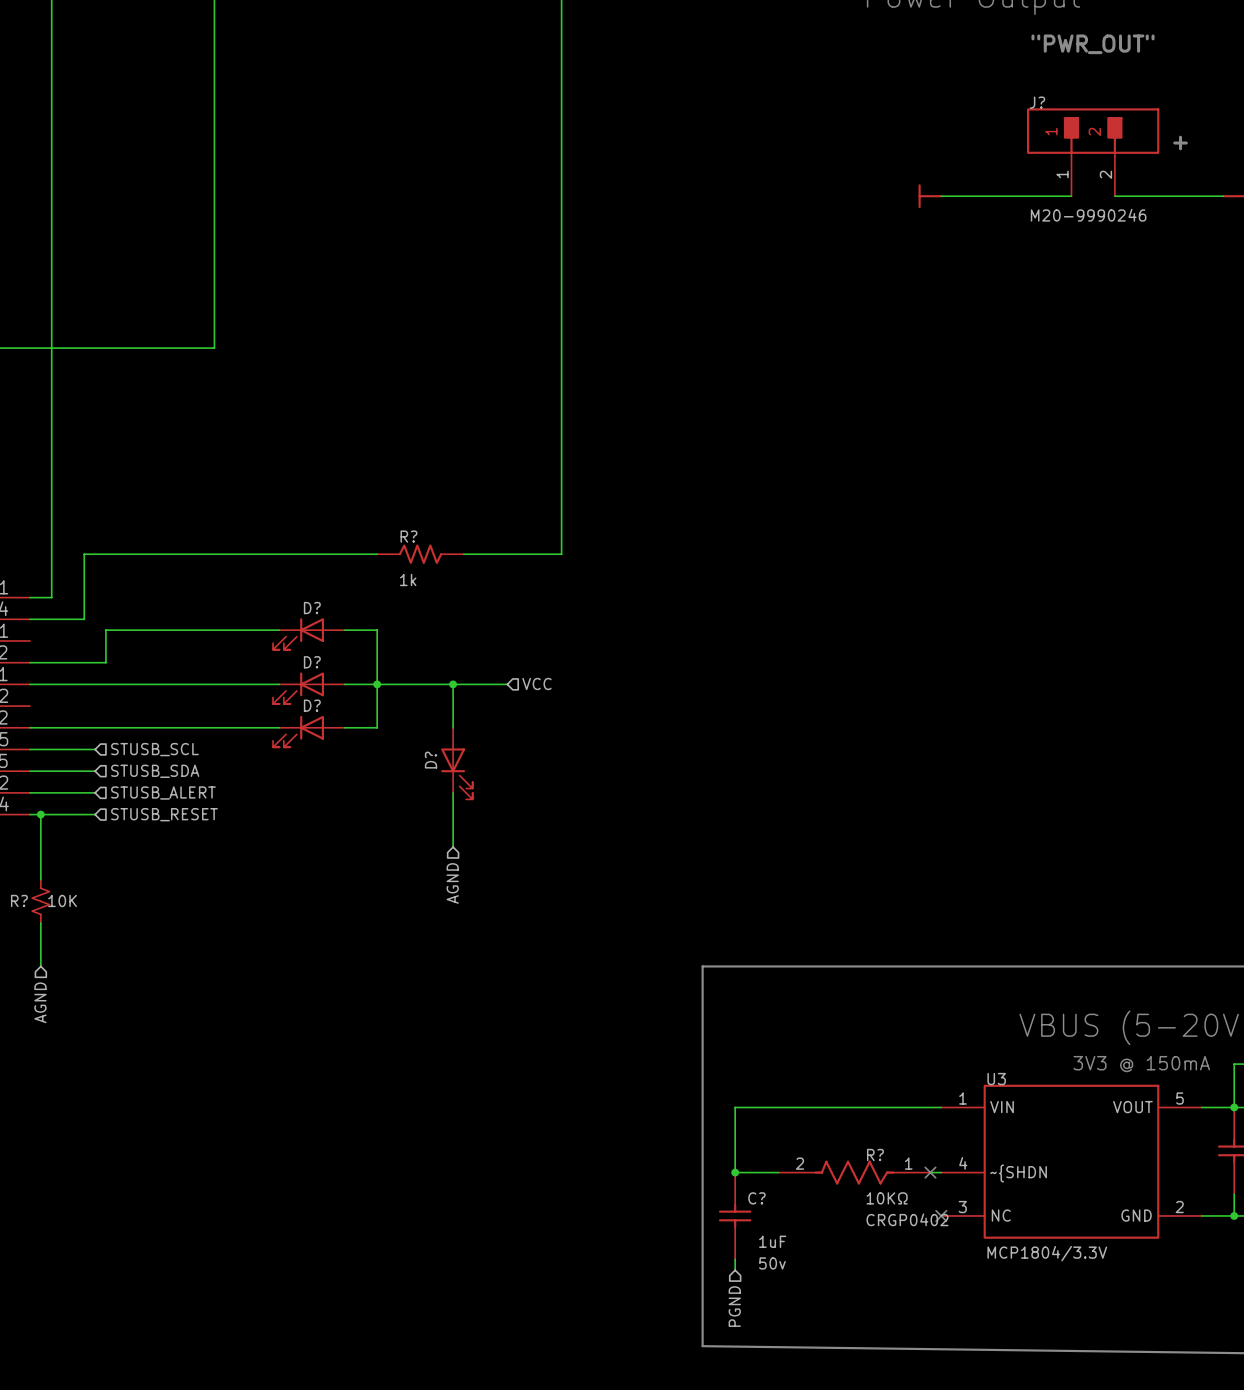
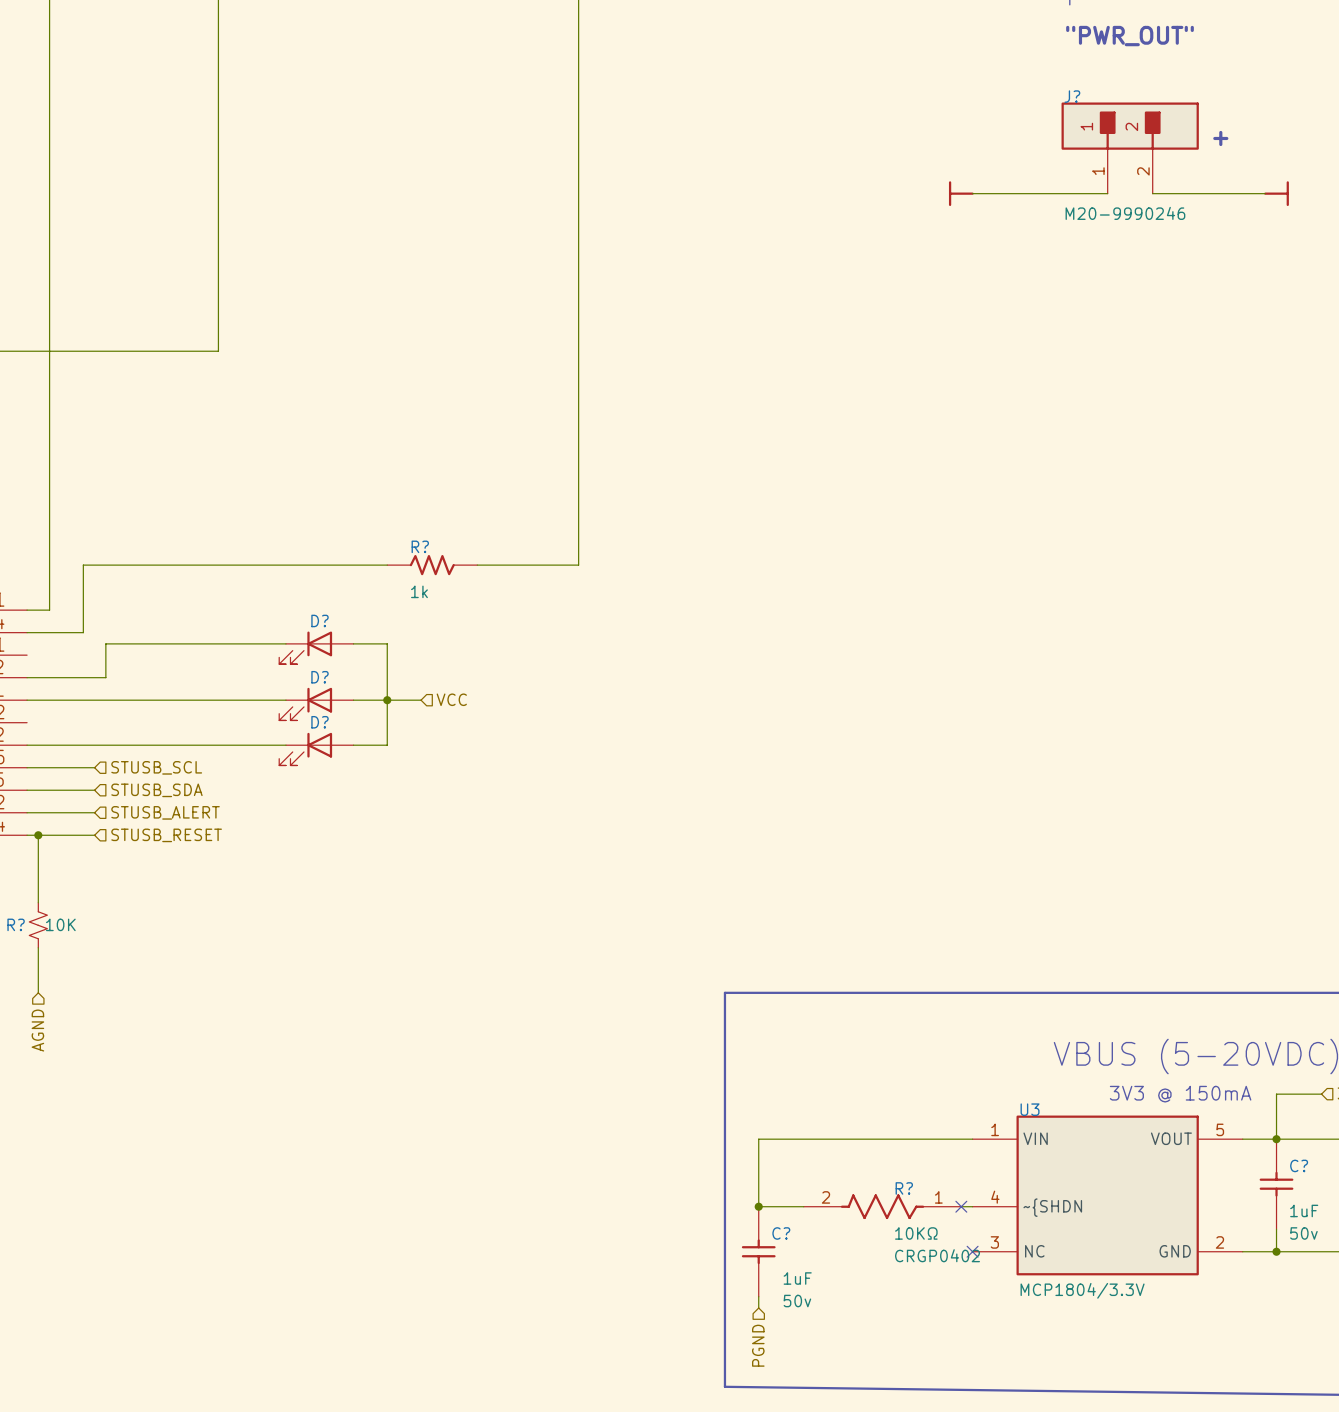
hierarchical label position: VCC (536, 683) -> VCC (451, 699)
wire: (409, 684) (507, 684) -> none
wire: (453, 684) (453, 727) -> none
junction: (453, 684) -> none
D?: (456, 763) -> none
wire: (453, 792) (453, 847) -> none
hierarchical label: AGND (452, 883) -> none

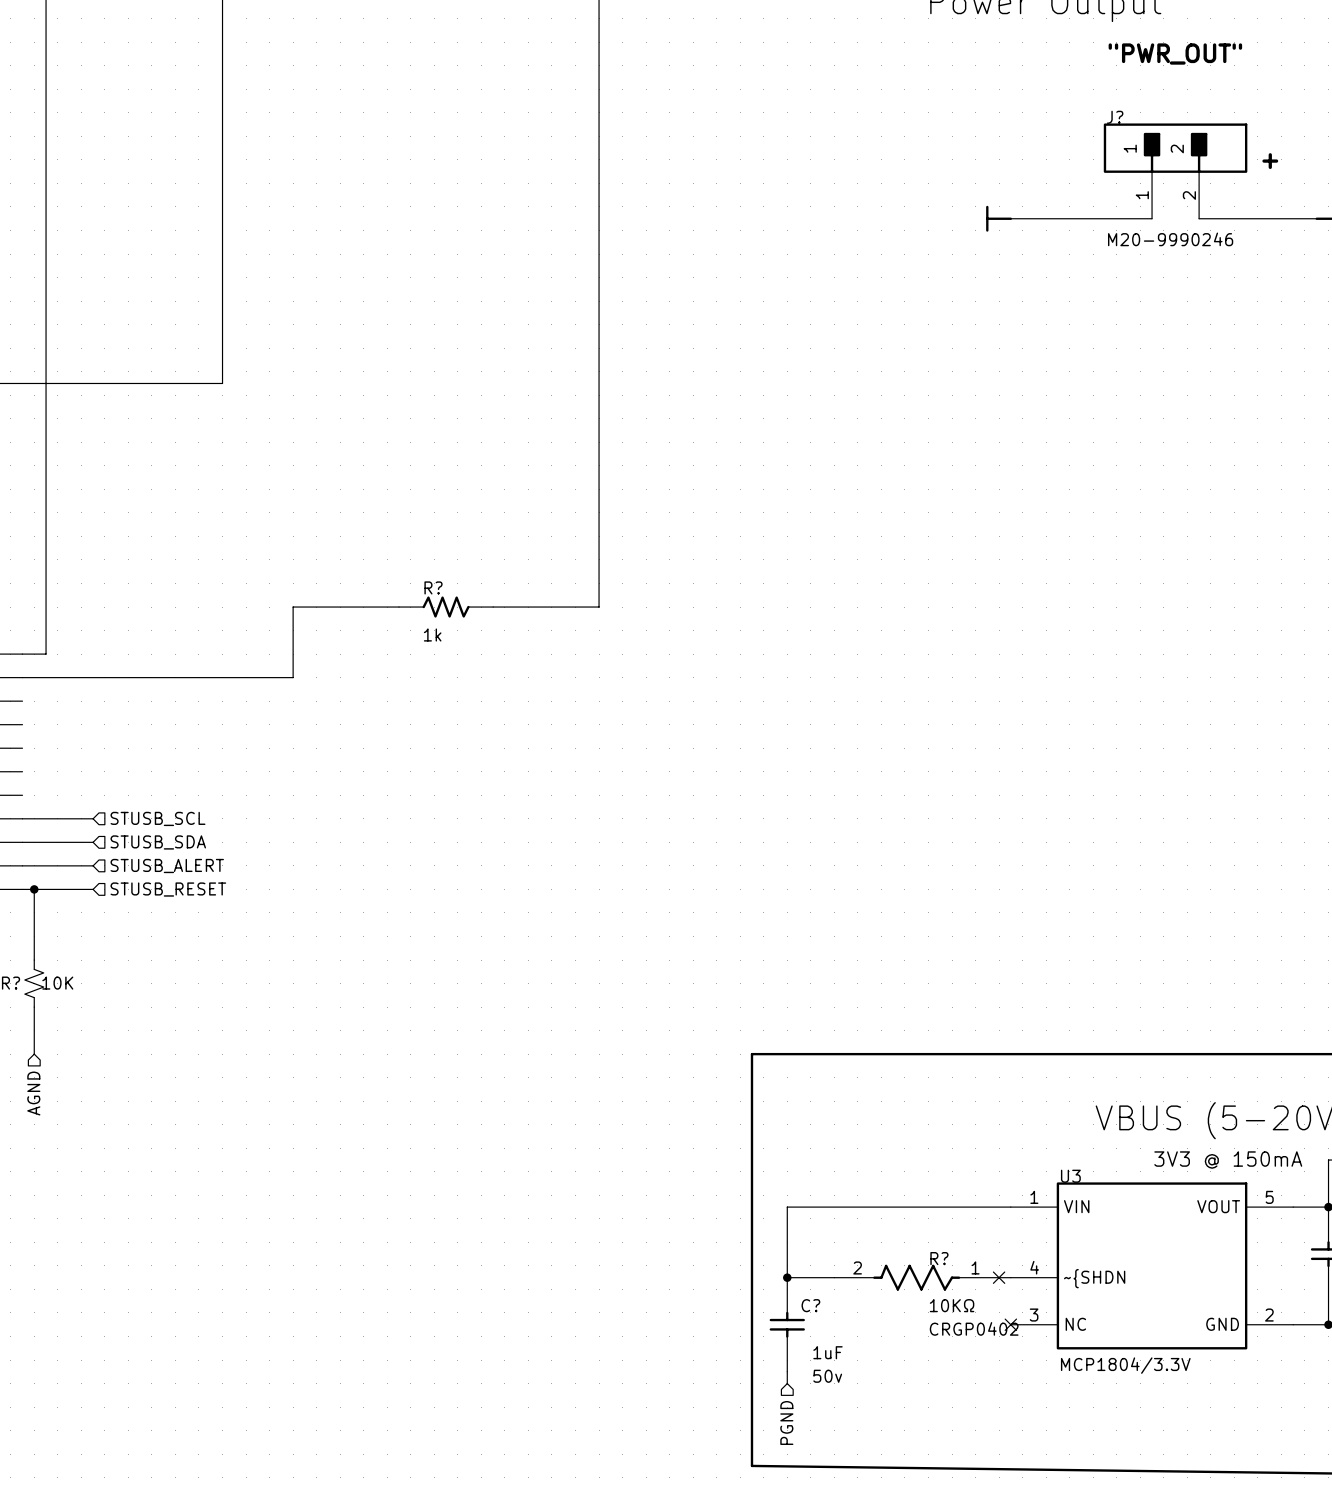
wire: (285, 565) (83, 565) (83, 632) -> (293, 607) (293, 677) (81, 677)
wire: (285, 643) (105, 643) (105, 677) (27, 677) -> none
wire: (353, 643) (387, 643) (387, 745) (353, 745) -> none
D?: (316, 647) -> none
hierarchical label: VCC (451, 699) -> none
wire: (27, 700) (285, 700) -> none
wire: (353, 700) (421, 700) -> none
junction: (387, 700) -> none
D?: (316, 704) -> none
wire: (27, 745) (285, 745) -> none
D?: (316, 749) -> none

